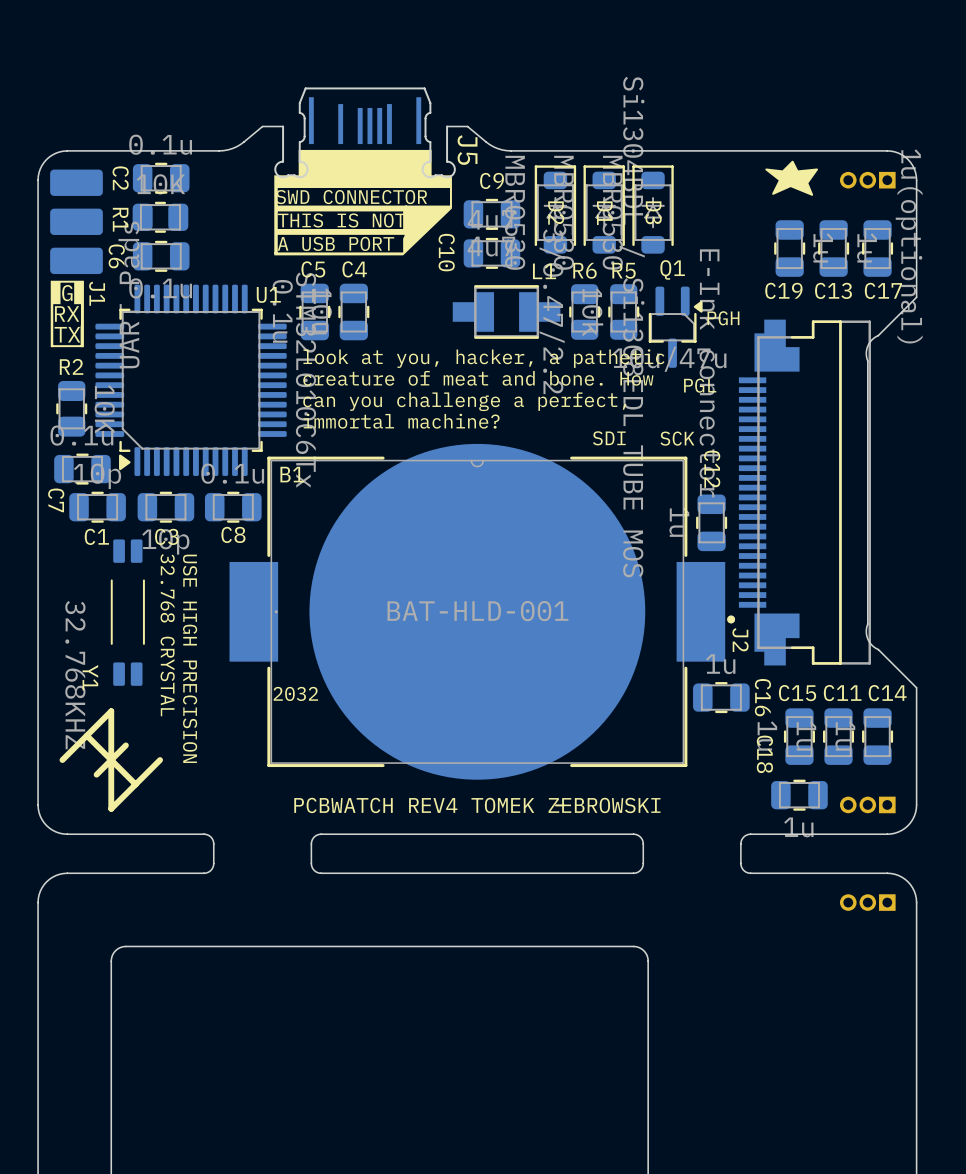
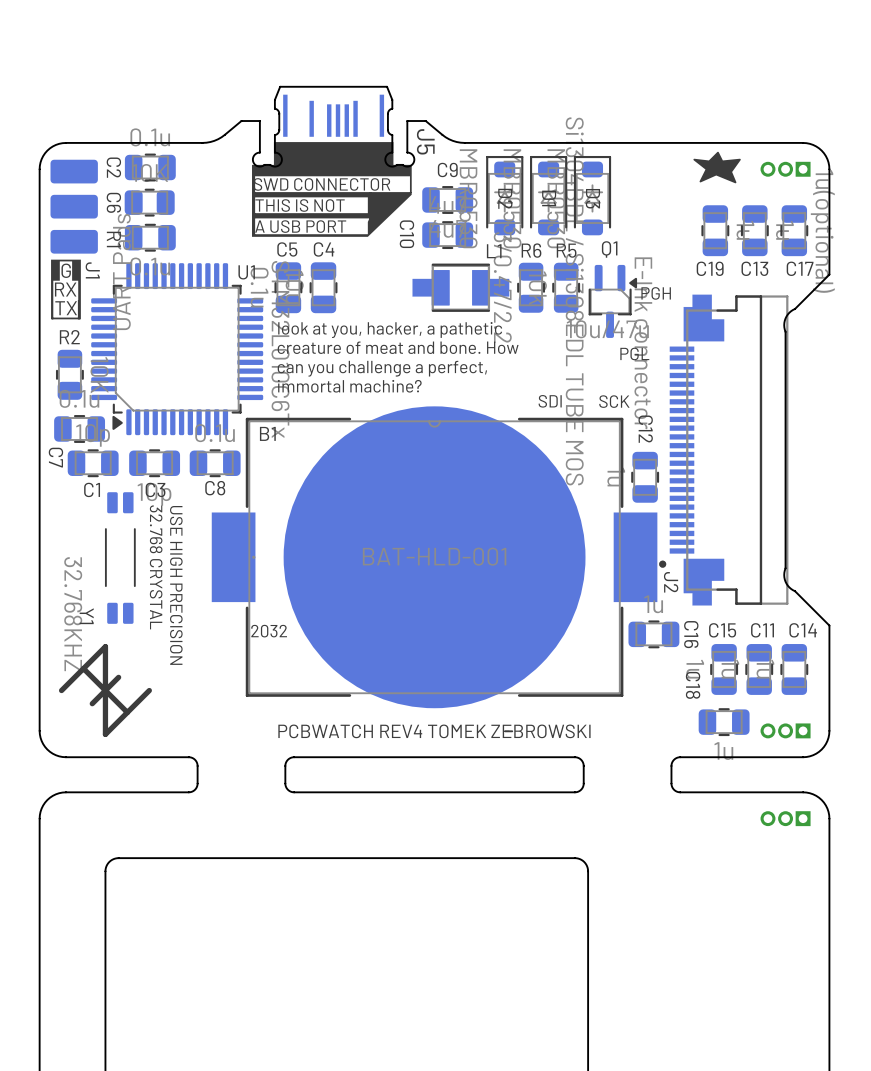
R1 name position: R1 (120, 219) -> R1 (113, 239)
C6 name position: C6 (116, 256) -> C6 (113, 202)

